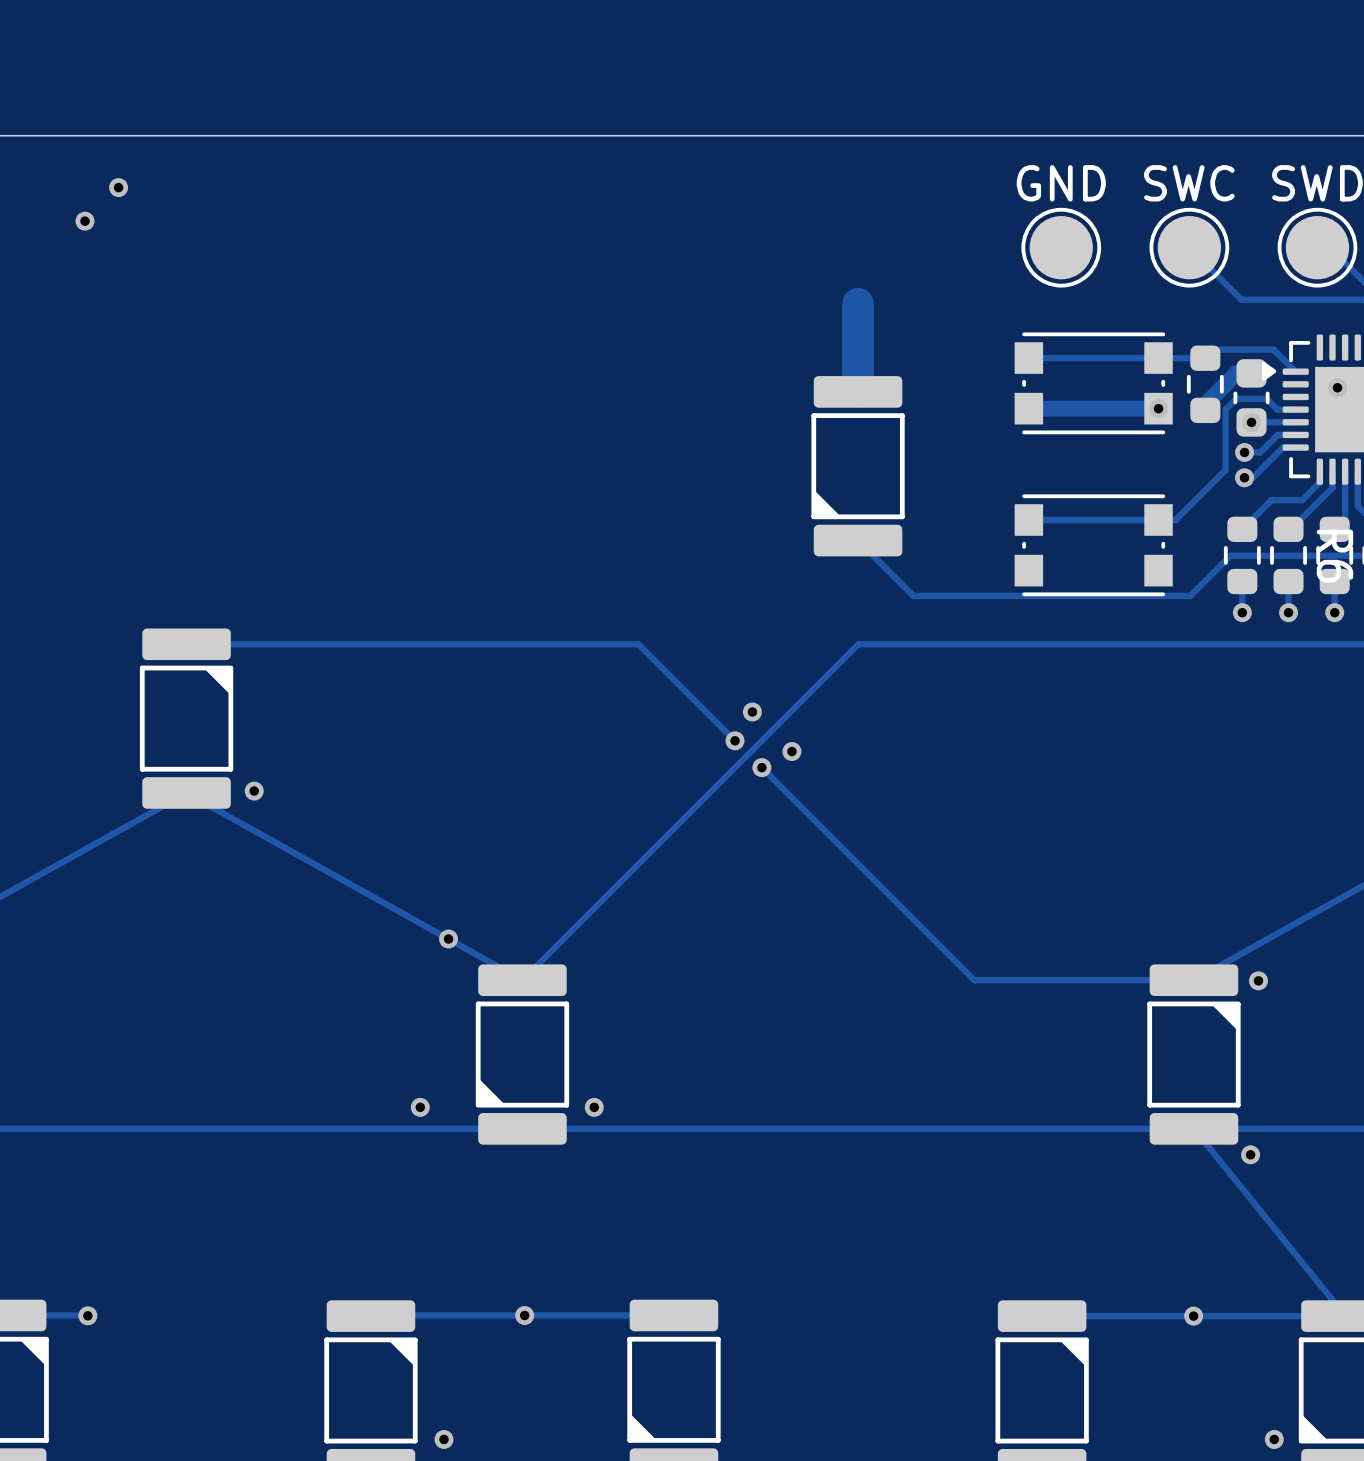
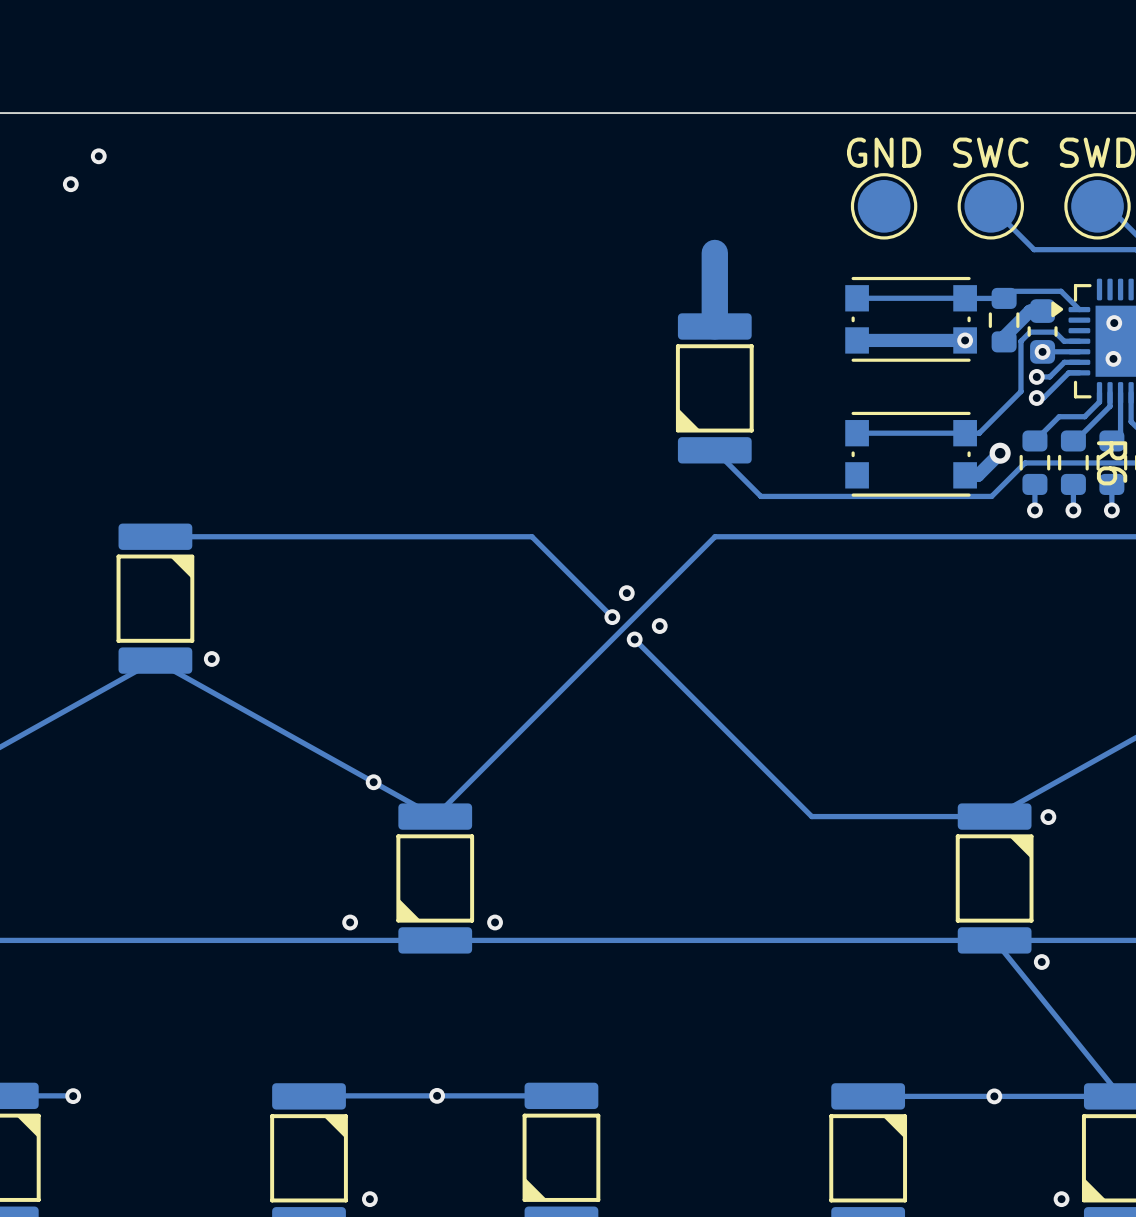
via: none -> (1113, 358)
track: none -> (1000, 453) (978, 475) (965, 475)
via: none -> (1000, 453)

